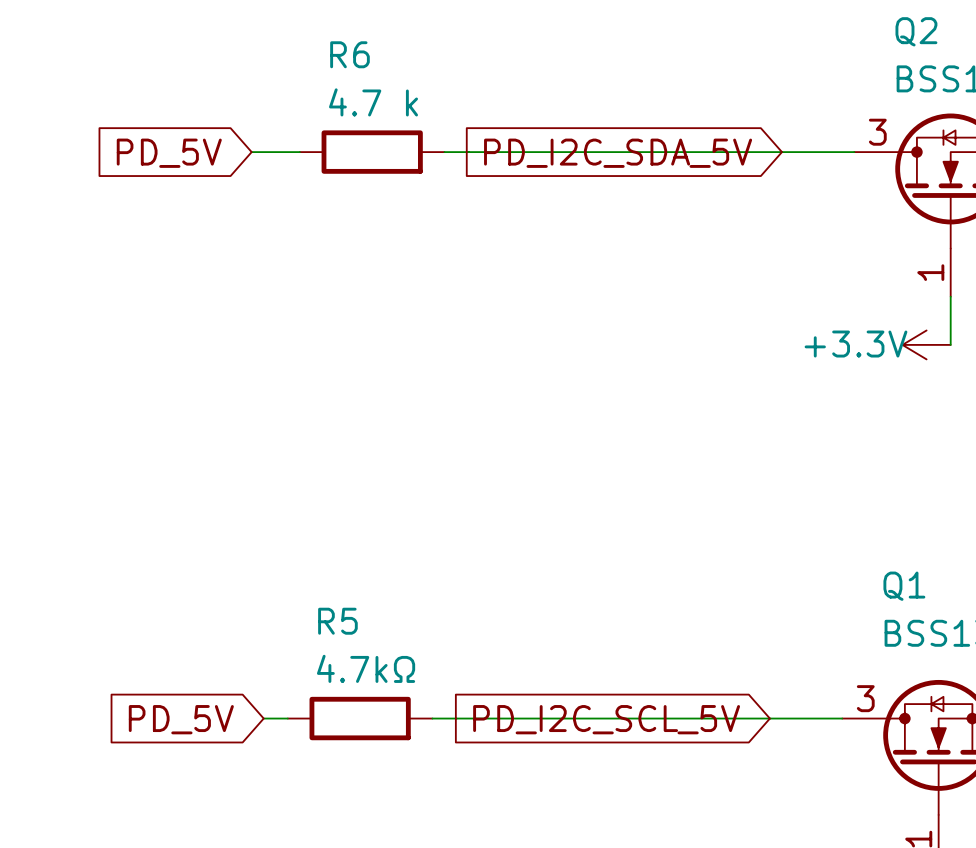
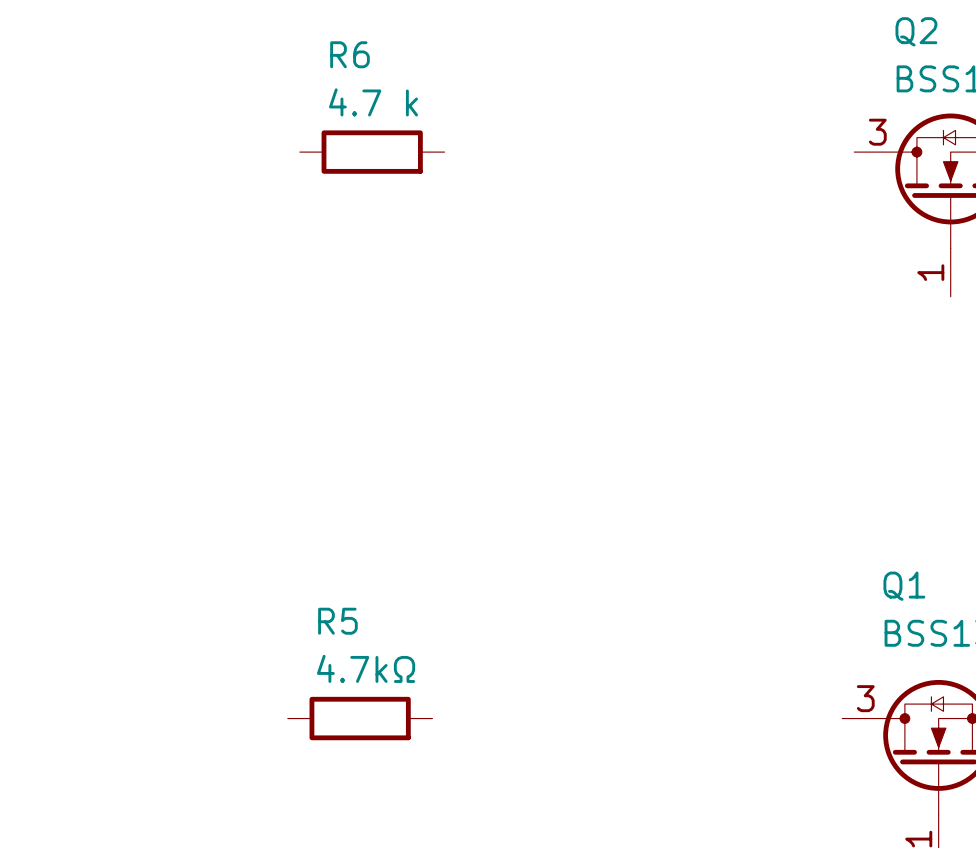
wire: (251, 152) (299, 152) -> none
wire: (444, 152) (854, 152) -> none
global label: PD_5V (169, 153) -> none
global label: PD_I2C_SDA_5V (618, 153) -> none
wire: (950, 296) (950, 344) -> none
power symbol: +3.3V (926, 344) -> none
wire: (263, 718) (287, 718) -> none
wire: (432, 718) (842, 718) -> none
global label: PD_5V (181, 719) -> none
global label: PD_I2C_SCL_5V (606, 719) -> none

